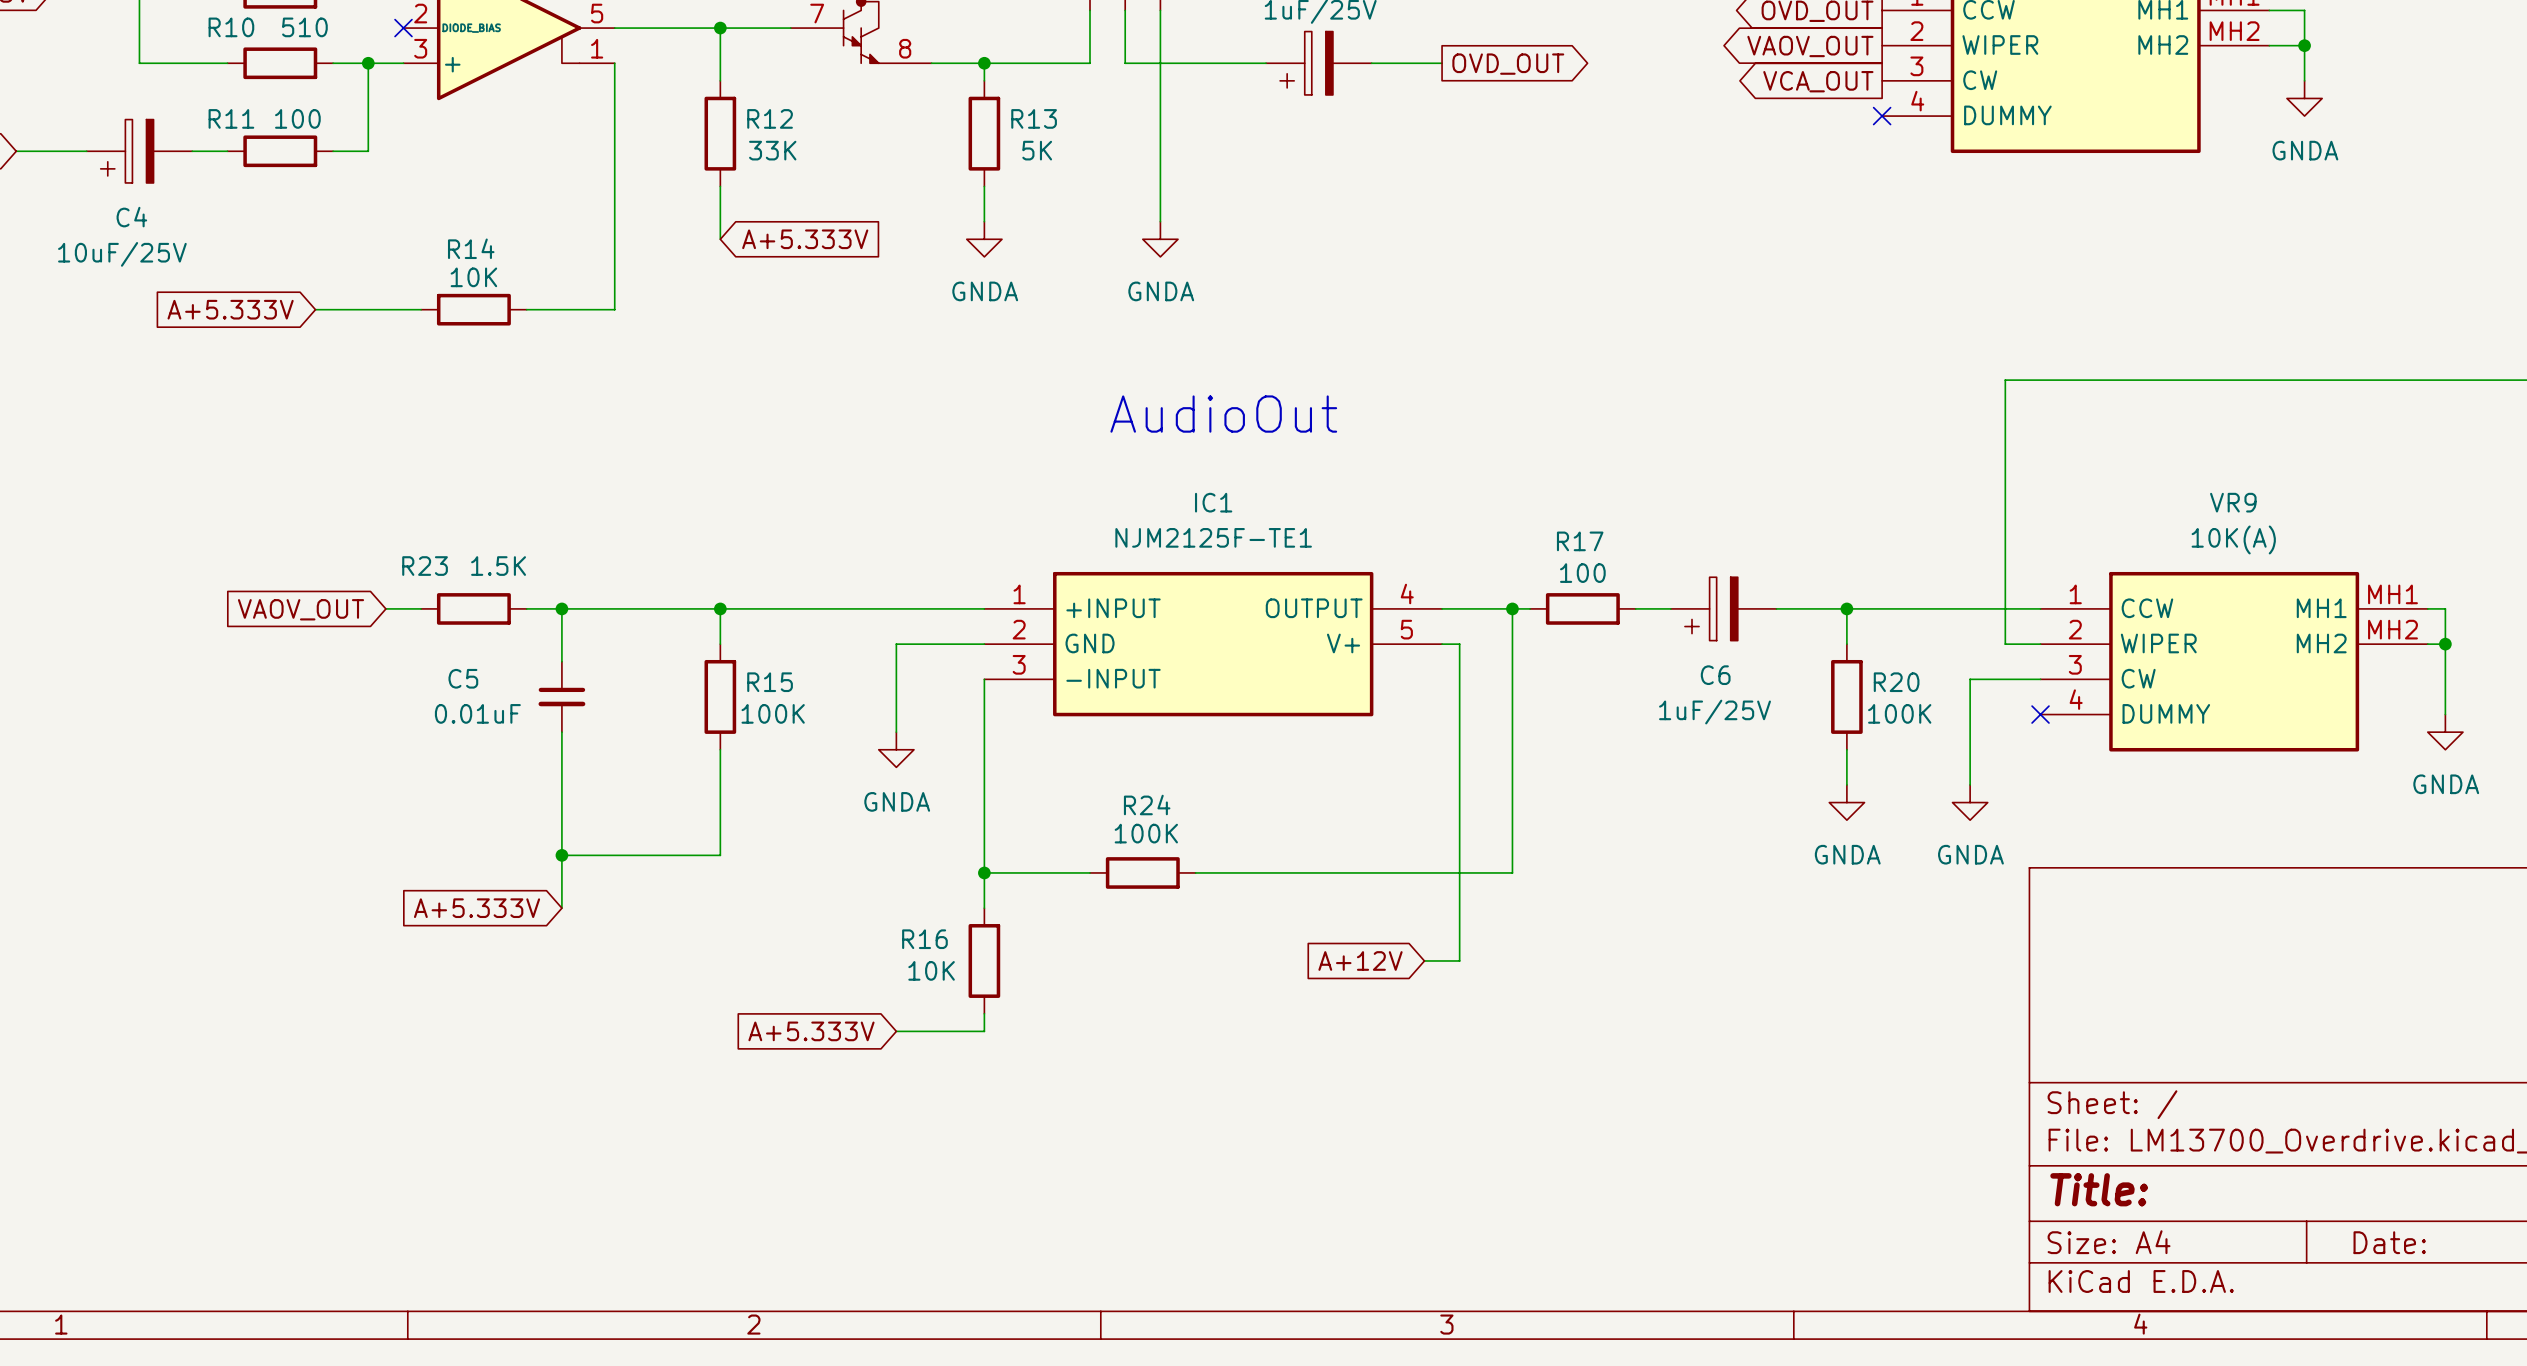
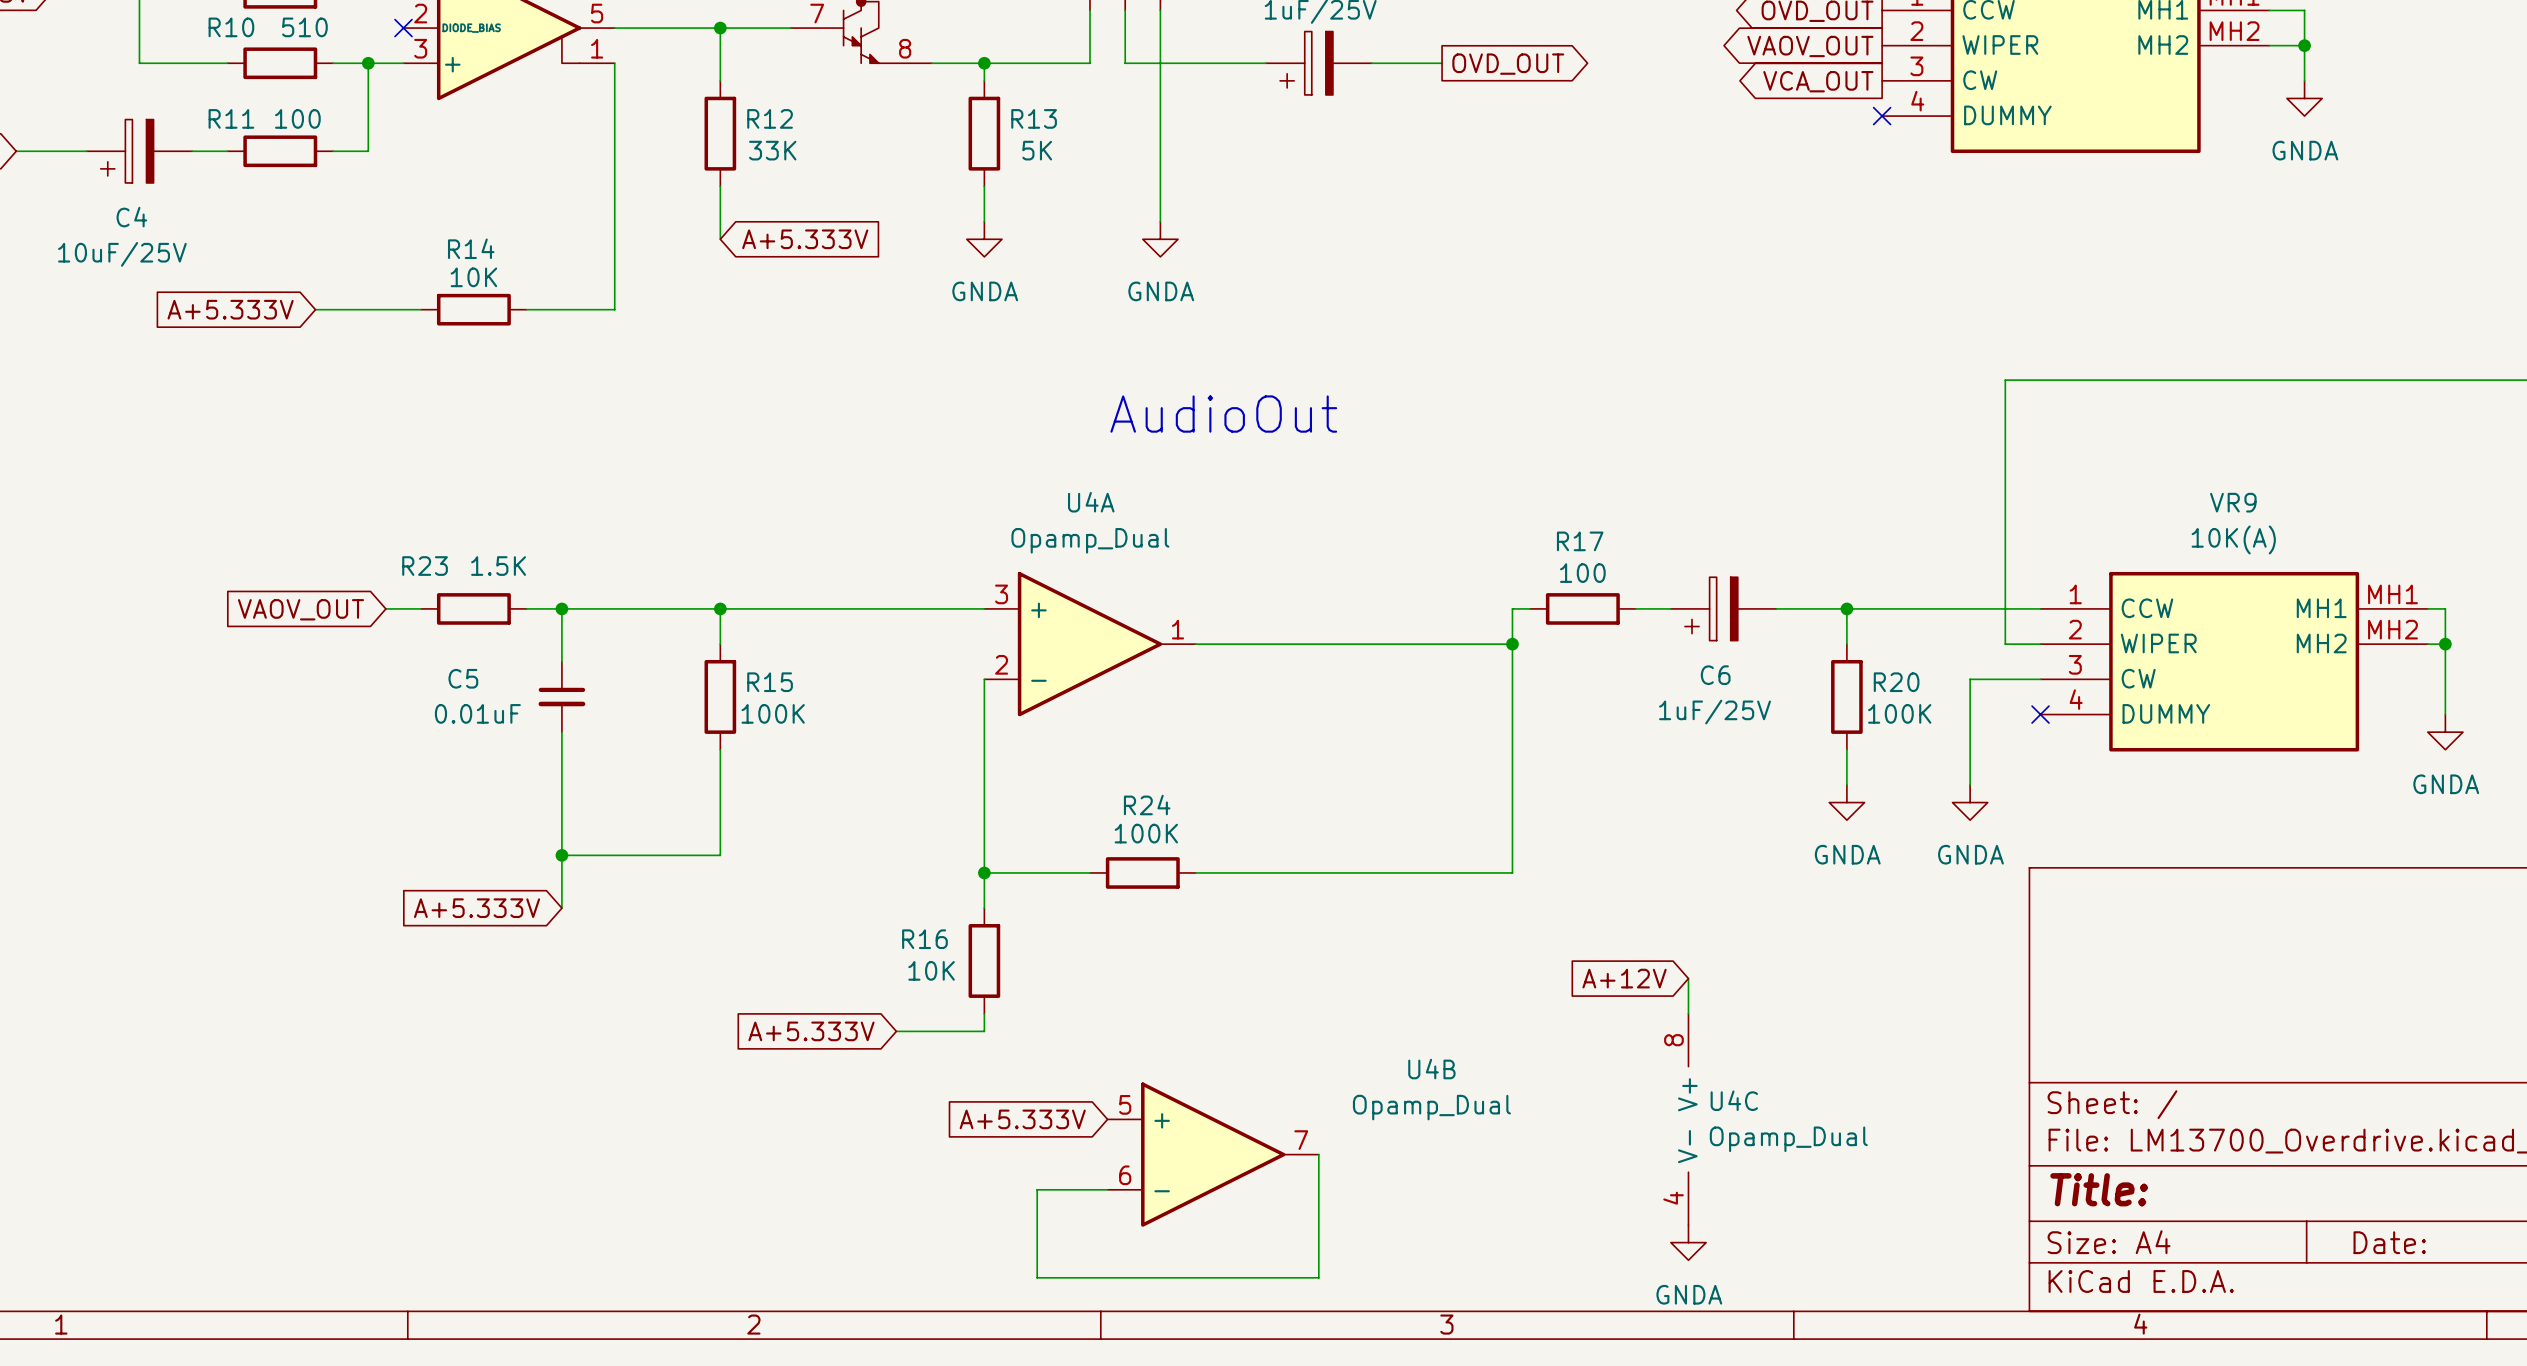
wire: (1442, 608) (1512, 608) -> none
junction position: (1512, 608) -> (1512, 644)
wire: (984, 644) (896, 644) (896, 732) -> none
U4A: none -> Opamp_Dual (1090, 644)
IC1: NJM2125F-TE1 (1213, 644) -> none
wire: (1459, 644) (1459, 960) (1424, 960) -> (1459, 644) (1512, 644)
power symbol: GNDA (896, 749) -> none
global label position: A+12V (1360, 960) -> A+12V (1624, 978)
wire: none -> (1688, 978) (1688, 1013)
global label: none -> A+5.333V (1022, 1119)
U4C: none -> Opamp_Dual (1688, 1119)
U4B: none -> Opamp_Dual (1213, 1154)
wire: none -> (1318, 1154) (1318, 1277) (1037, 1277) (1037, 1189) (1107, 1189)
power symbol: none -> GNDA (1688, 1242)

